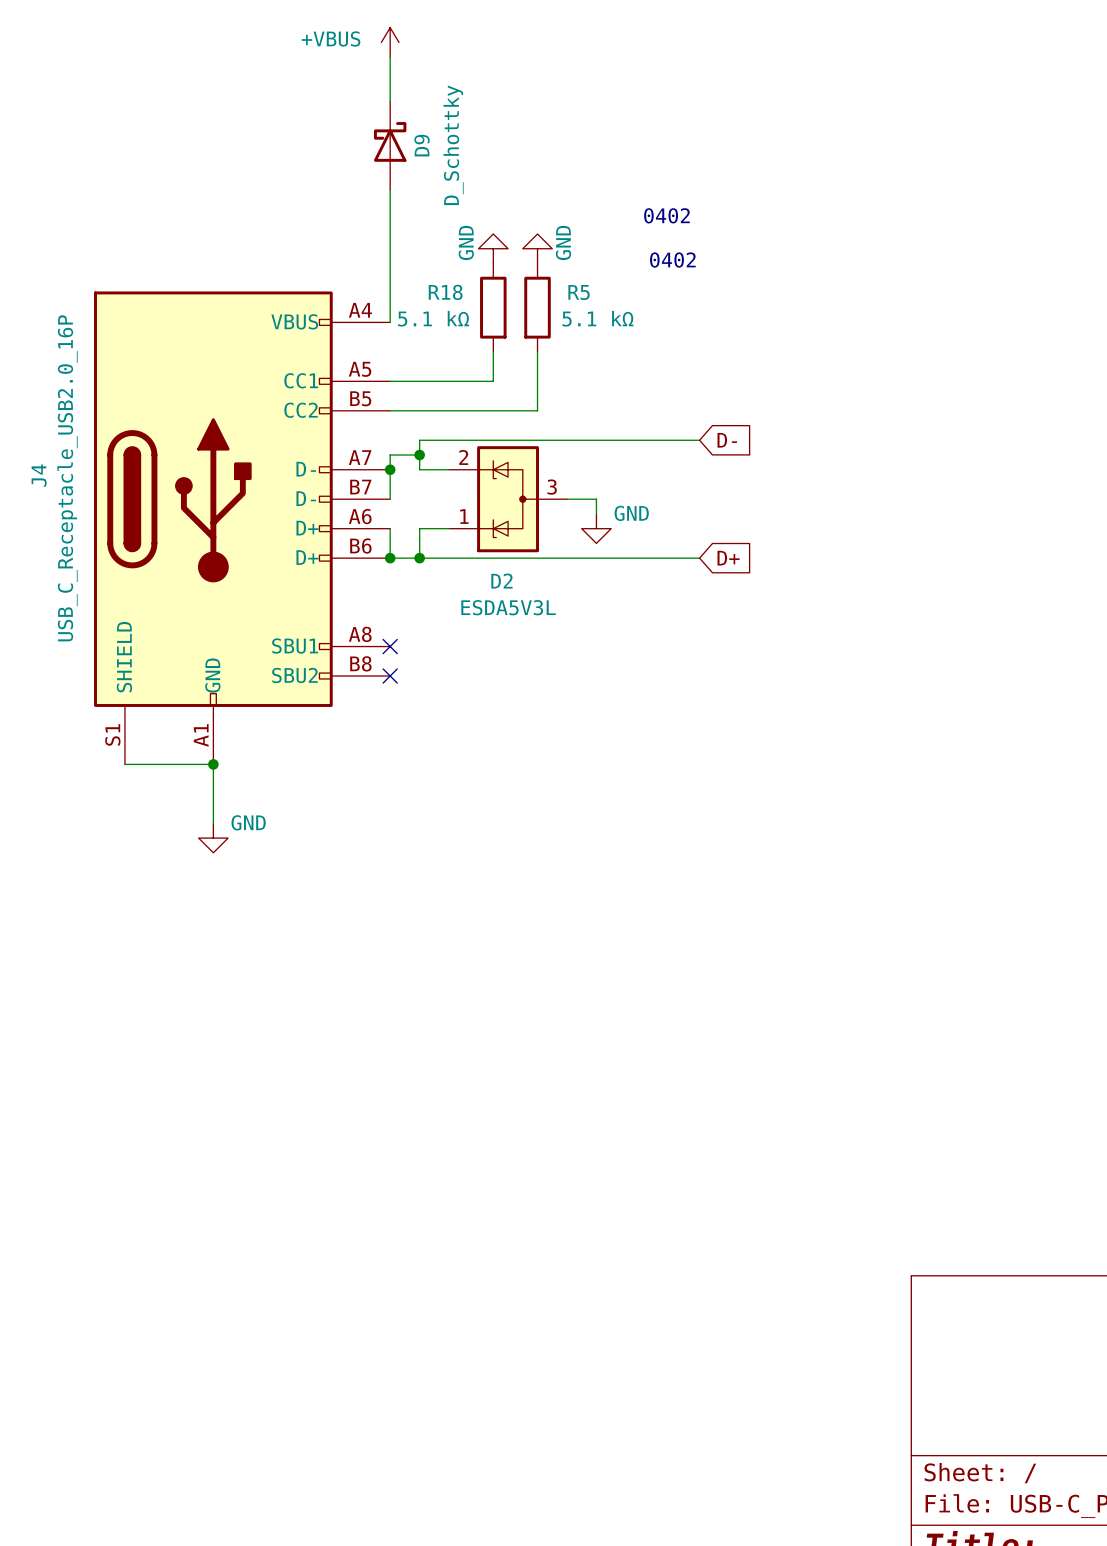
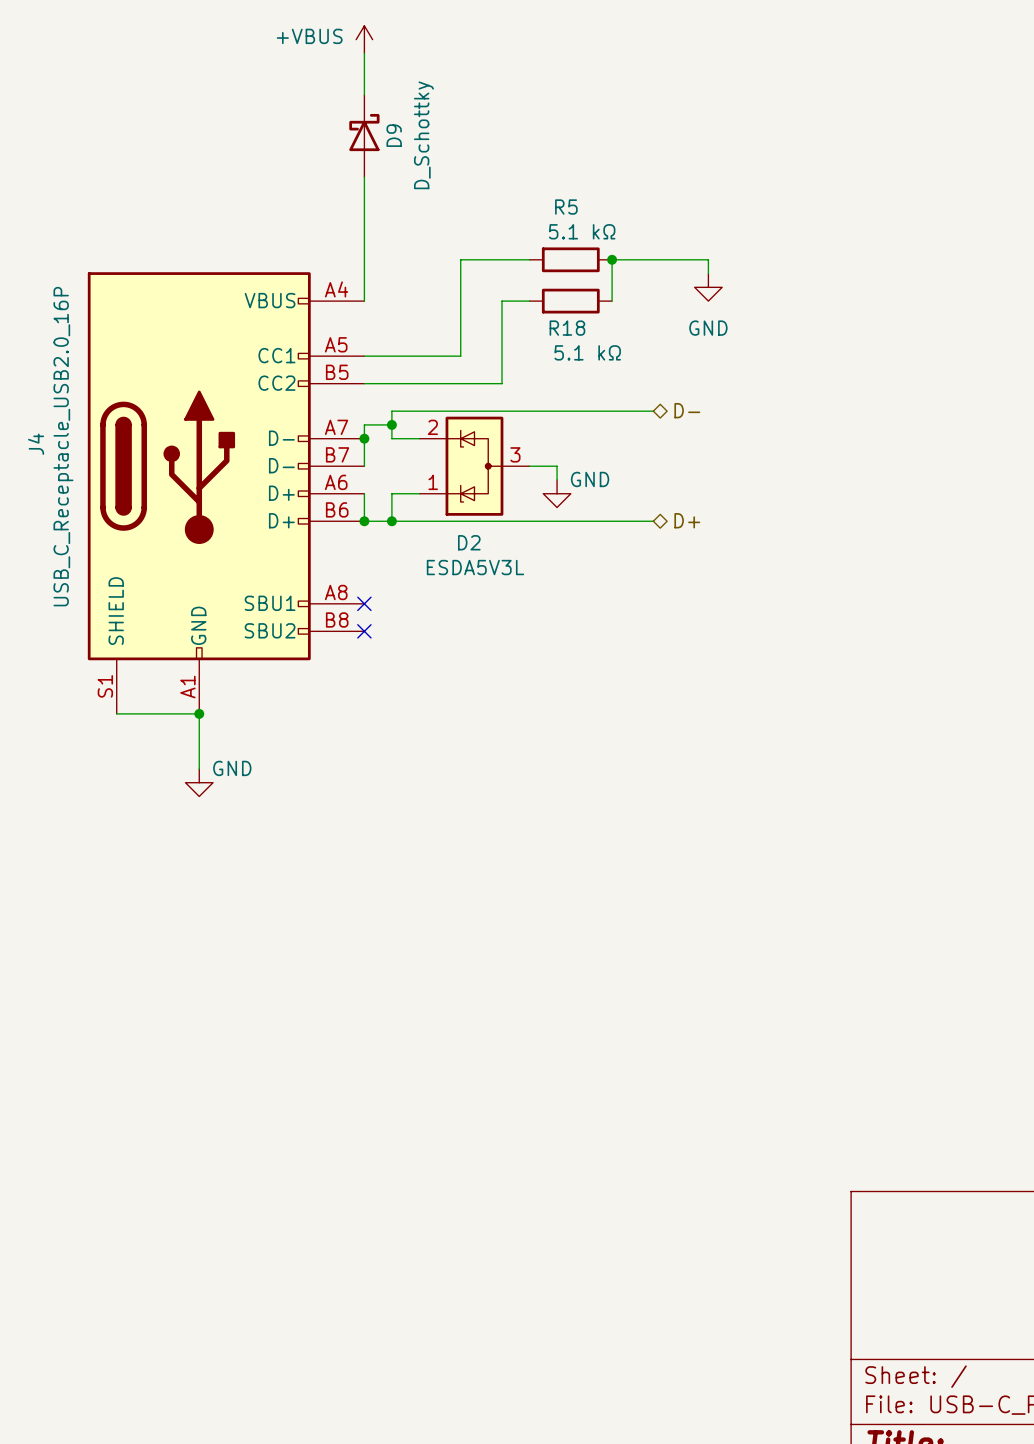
text: 0402 (666, 215) -> none
power symbol: GND (493, 248) -> none
power symbol: GND (537, 248) -> none
text: 0402 (672, 260) -> none
wire: none -> (529, 259) (460, 259) (460, 328)
junction: none -> (612, 259)
R18 name position: R18 (445, 292) -> R18 (567, 328)
R5 name position: R5 (579, 292) -> R5 (566, 207)
wire: none -> (708, 273) (708, 259) (612, 259) (612, 301)
R18 rotation: 0° (493, 307) -> 90° clockwise (570, 301)
R18 position: (493, 307) -> (570, 301)
R5 rotation: 0° (537, 307) -> 90° clockwise (570, 259)
R5 position: (537, 307) -> (570, 259)
power symbol: none -> GND (708, 287)
R18 value position: 5.1 kΩ (433, 318) -> 5.1 kΩ (587, 352)
R5 value position: 5.1 kΩ (597, 318) -> 5.1 kΩ (582, 231)
wire: none -> (529, 301) (502, 301) (502, 328)
hierarchical label: none -> D- (687, 410)
global label: D- (727, 440) -> none
hierarchical label: none -> D+ (687, 520)
global label: D+ (728, 558) -> none

